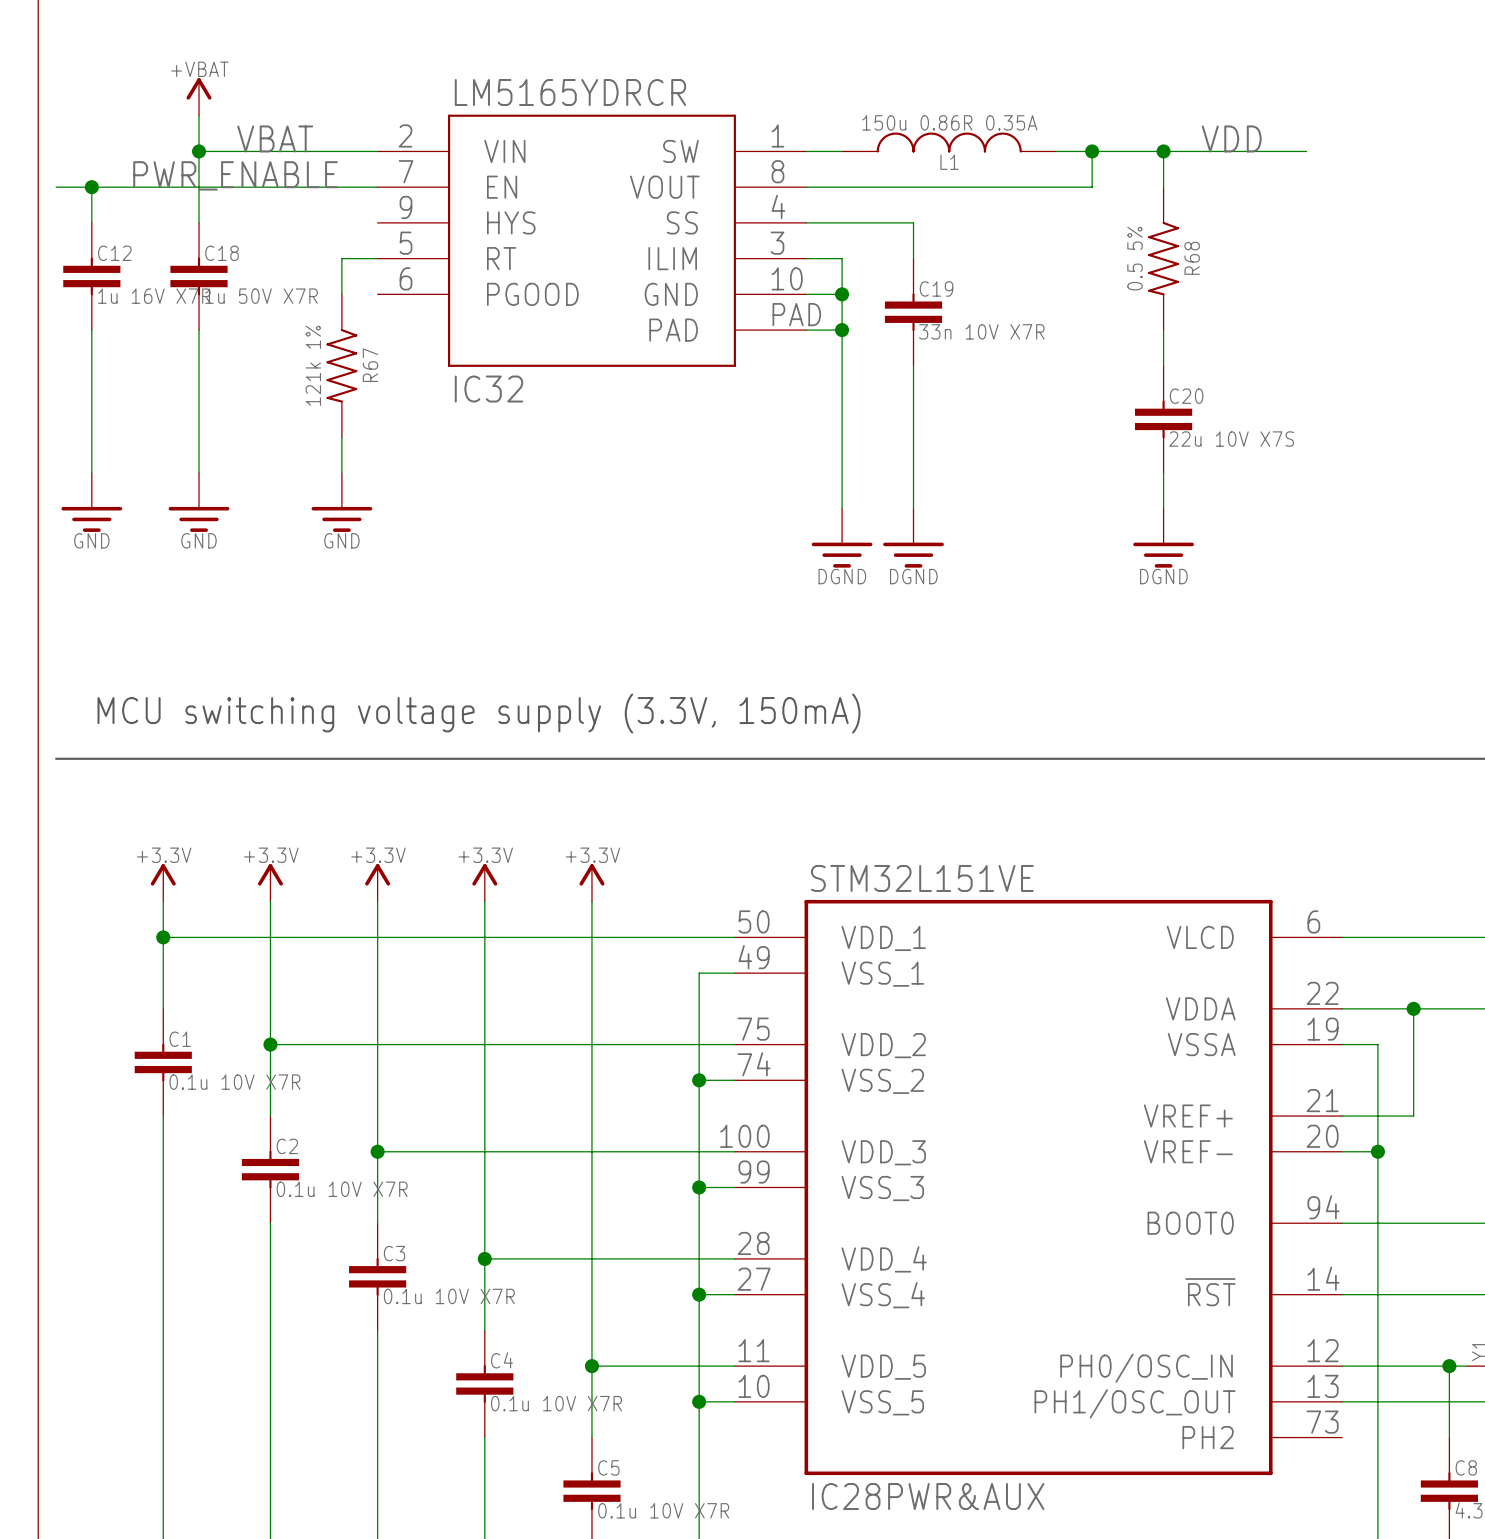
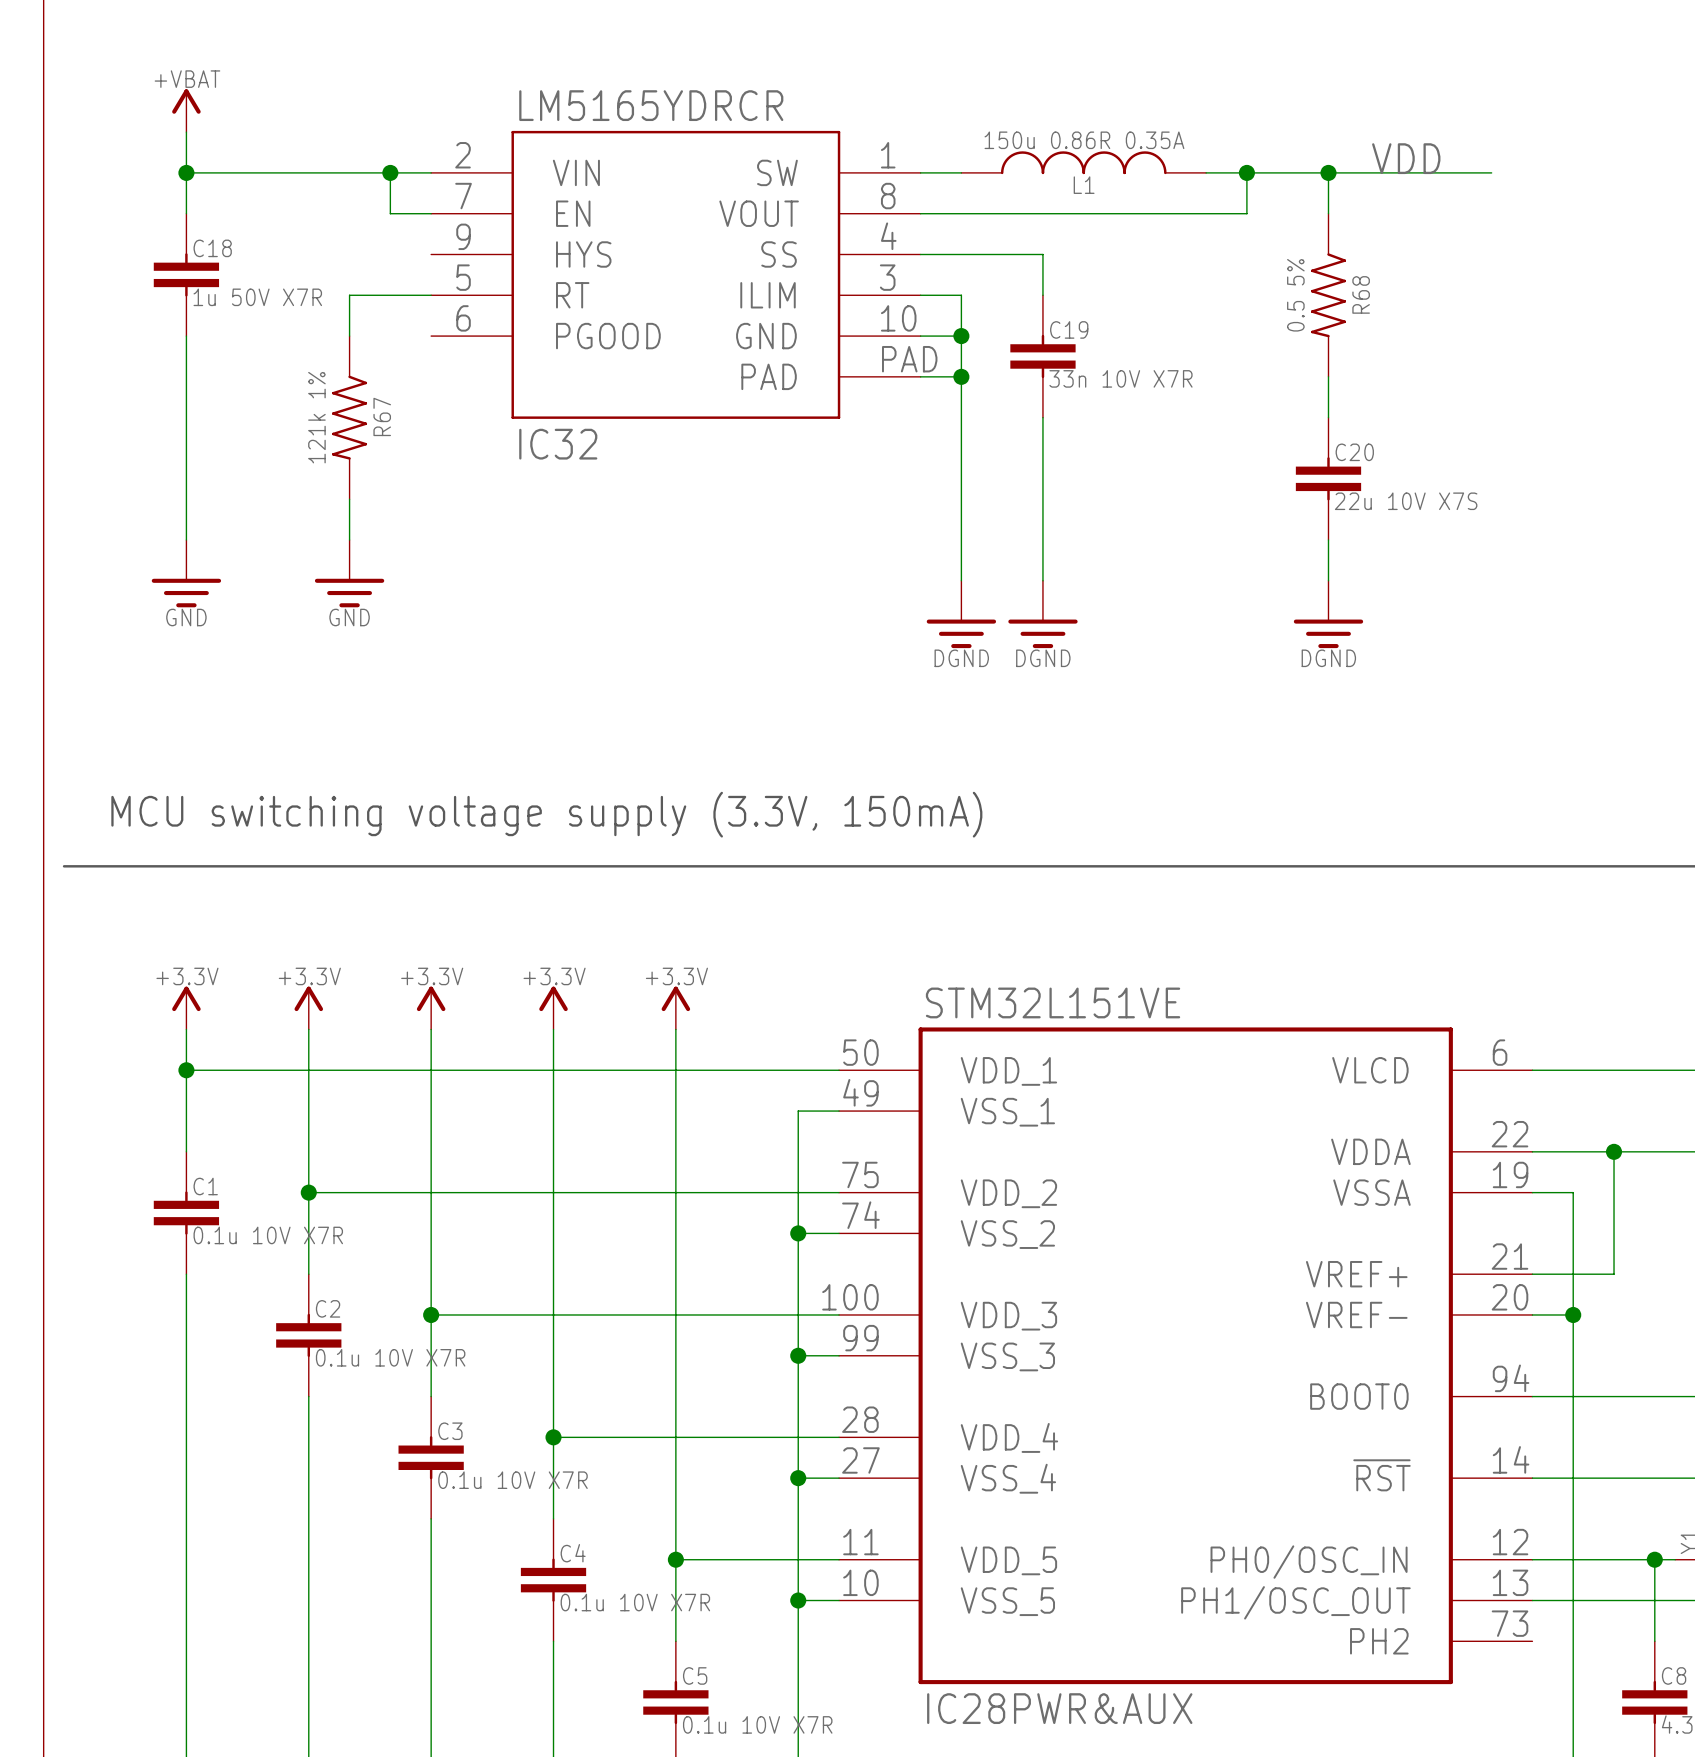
part position: (199, 96) -> (186, 110)
wire: none -> (186, 132) (186, 213)
wire: (199, 115) (199, 222) -> none
label: VBAT (275, 138) -> none
wire: none -> (186, 172) (227, 172)
junction position: (199, 151) -> (186, 172)
junction: none -> (390, 172)
label: PWR_ENABLE (235, 175) -> none
wire: (56, 187) (341, 187) -> (390, 172) (390, 213)
wire: (91, 187) (91, 222) -> none
junction: (91, 187) -> none
wire: (341, 258) (341, 294) -> (390, 295) (349, 295) (349, 336)
C12: 1u 16V X7R (91, 276) -> none
C18 position: (199, 276) -> (186, 274)
wire: none -> (186, 336) (186, 540)
wire: (91, 330) (91, 472) -> none
wire: (199, 330) (199, 472) -> none
R67 position: (341, 365) -> (349, 417)
wire: (341, 437) (341, 472) -> (349, 499) (349, 540)
power symbol: GND (91, 502) -> none
power symbol: none -> GND (186, 573)
power symbol: GND (199, 502) -> none
power symbol position: GND (341, 502) -> GND (349, 573)

